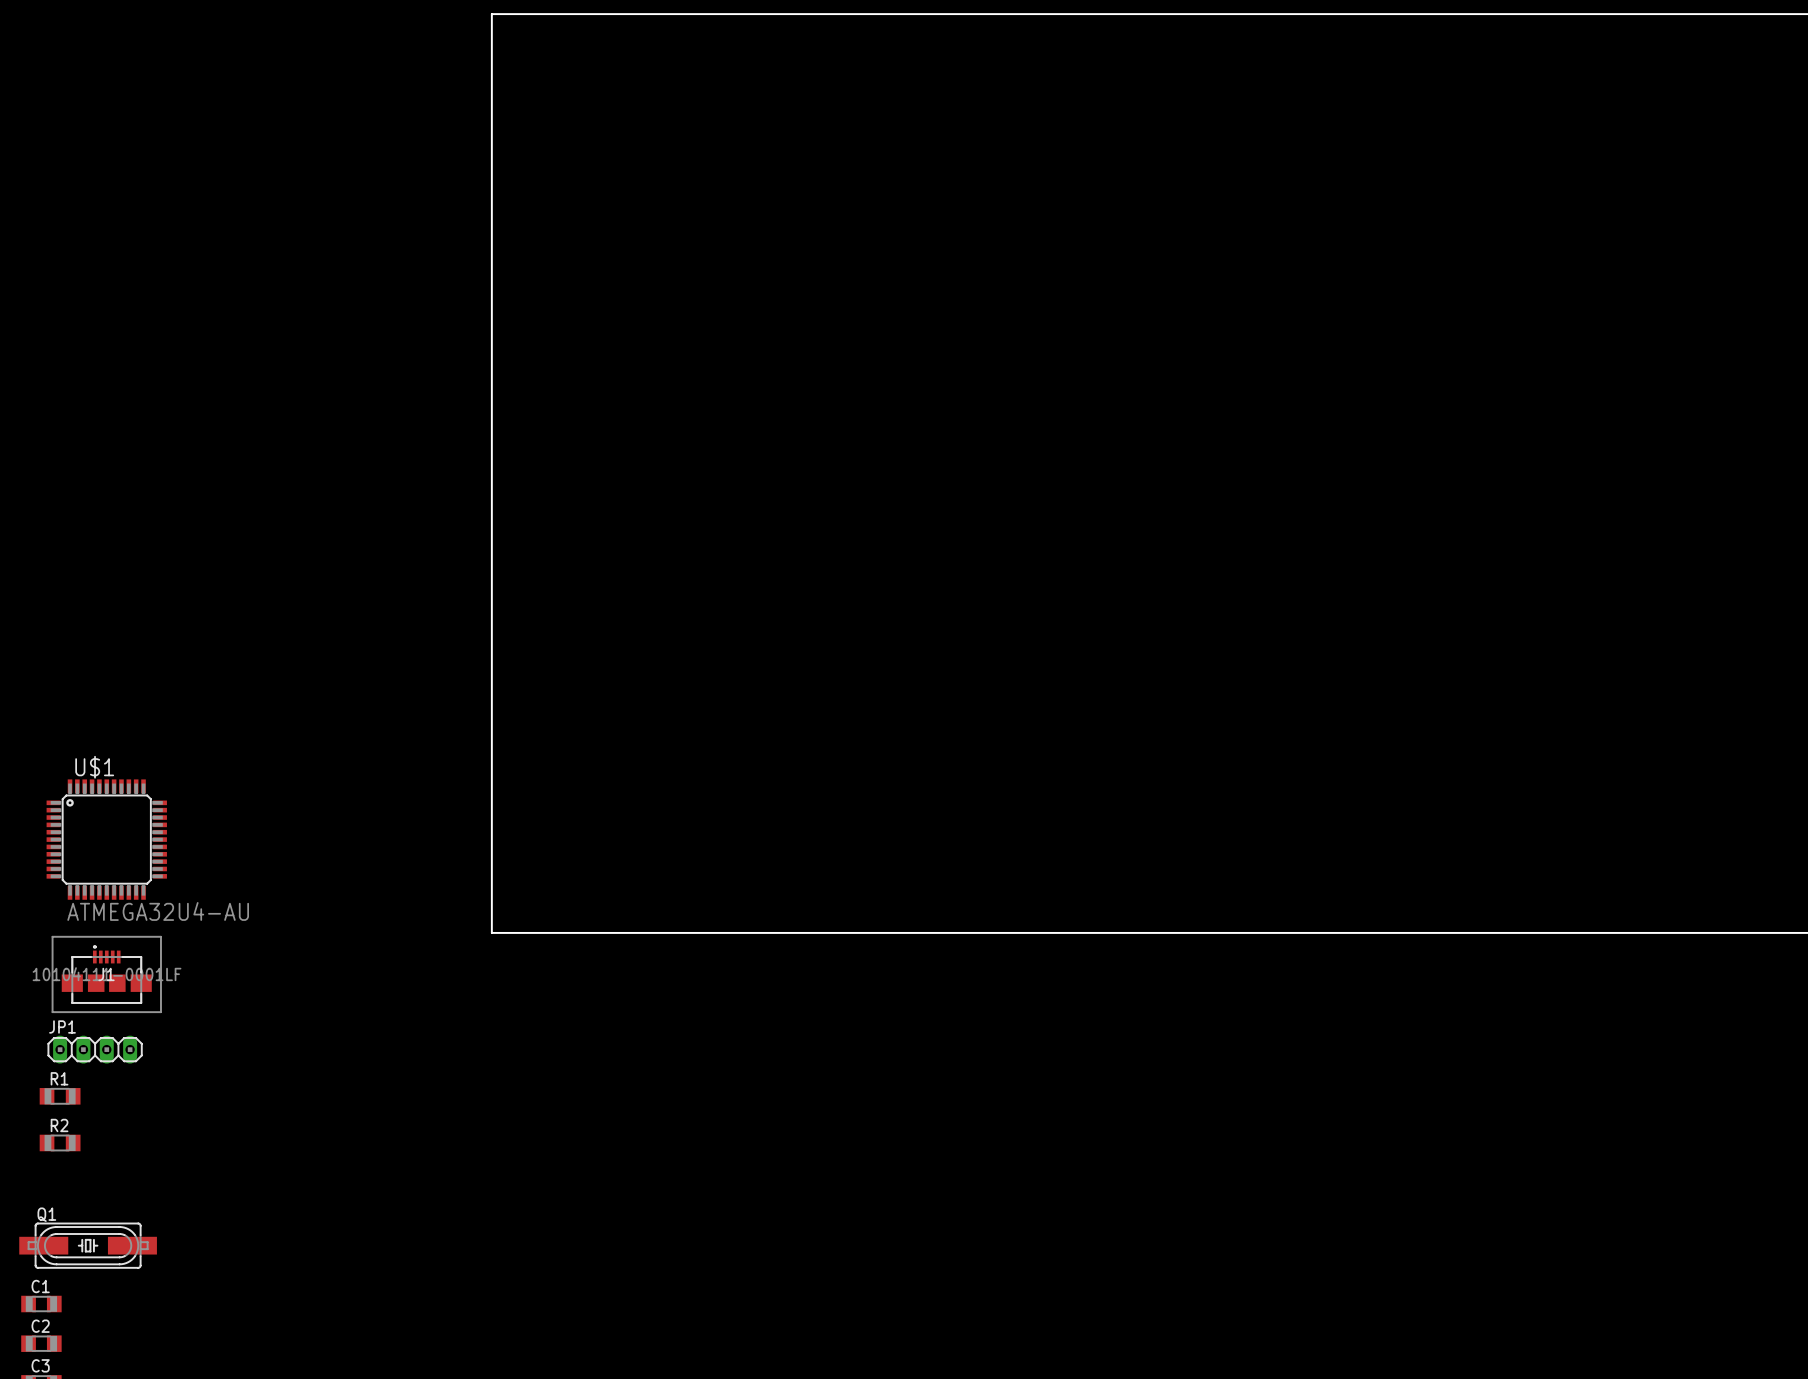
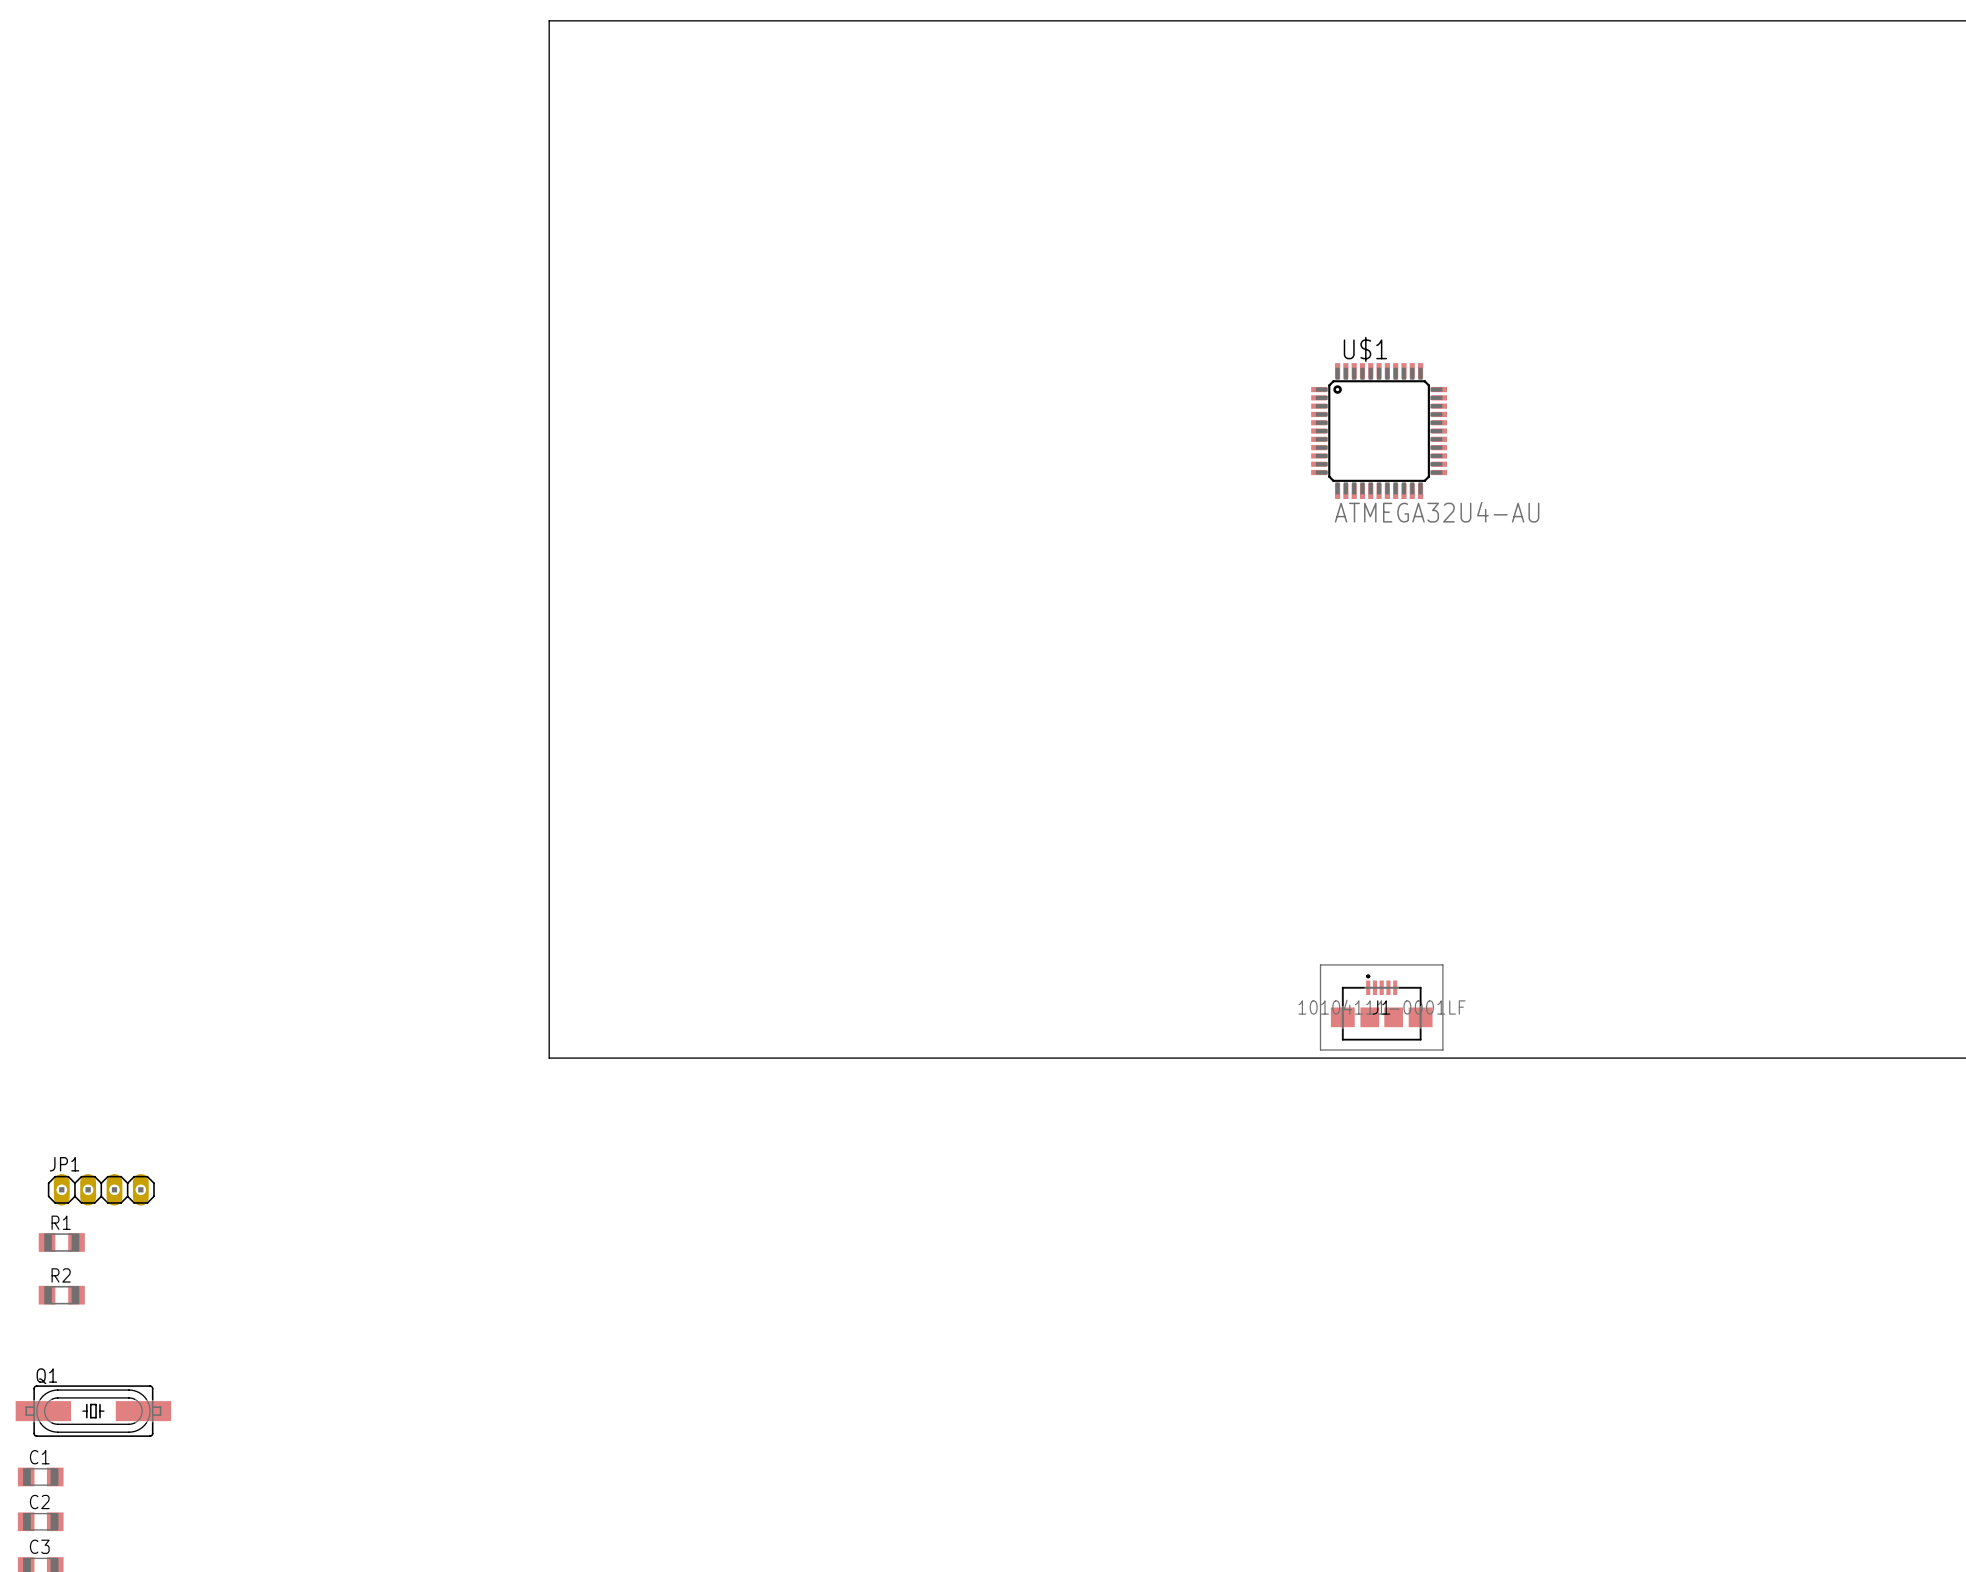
U$1 position: (106, 839) -> (1379, 431)
J1 position: (106, 974) -> (1381, 1007)

